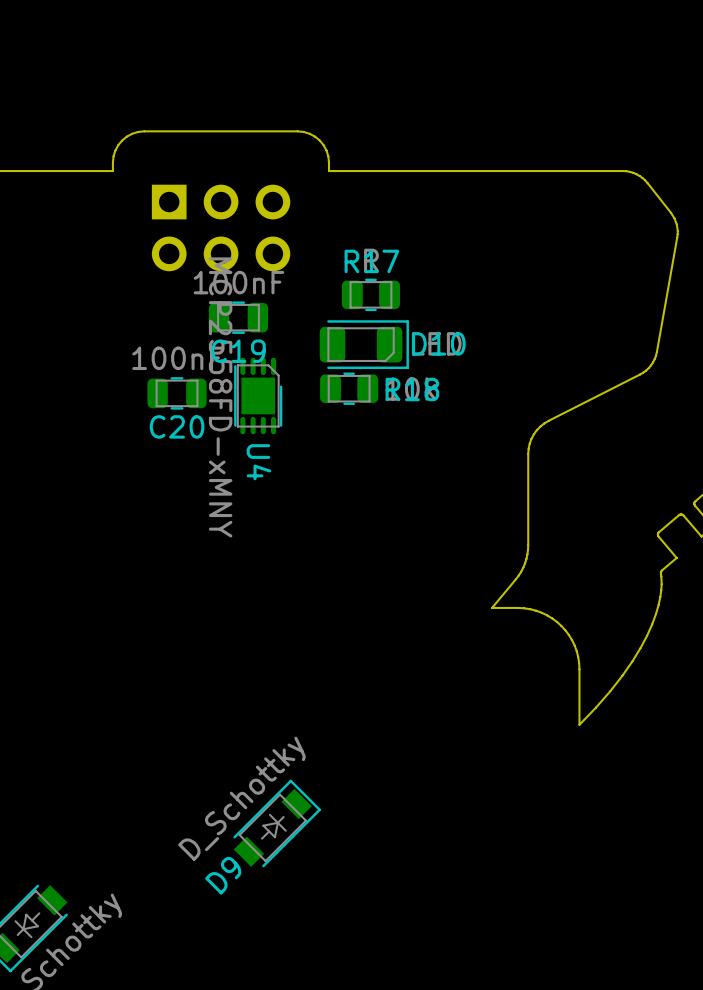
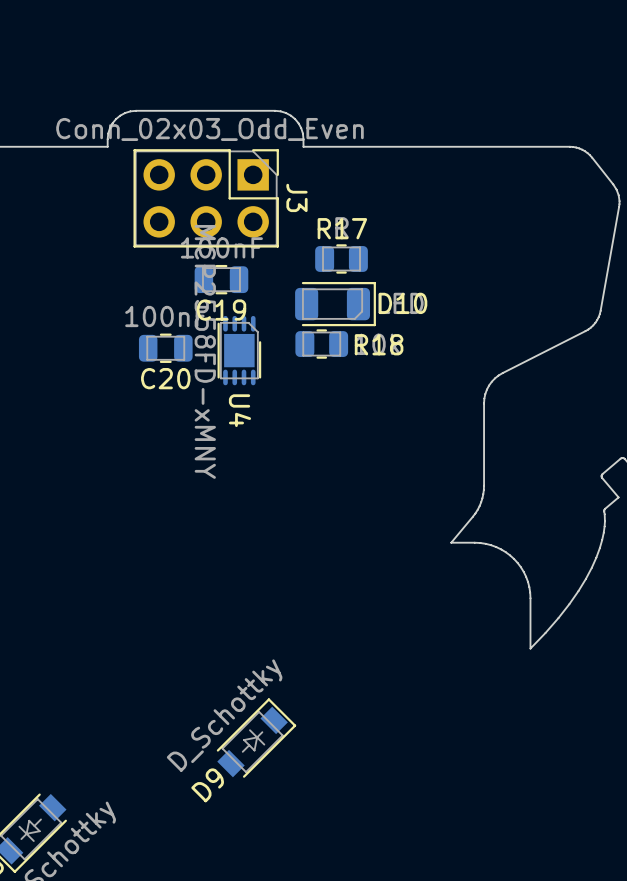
J3 side: top (221, 227) -> bottom (206, 198)

